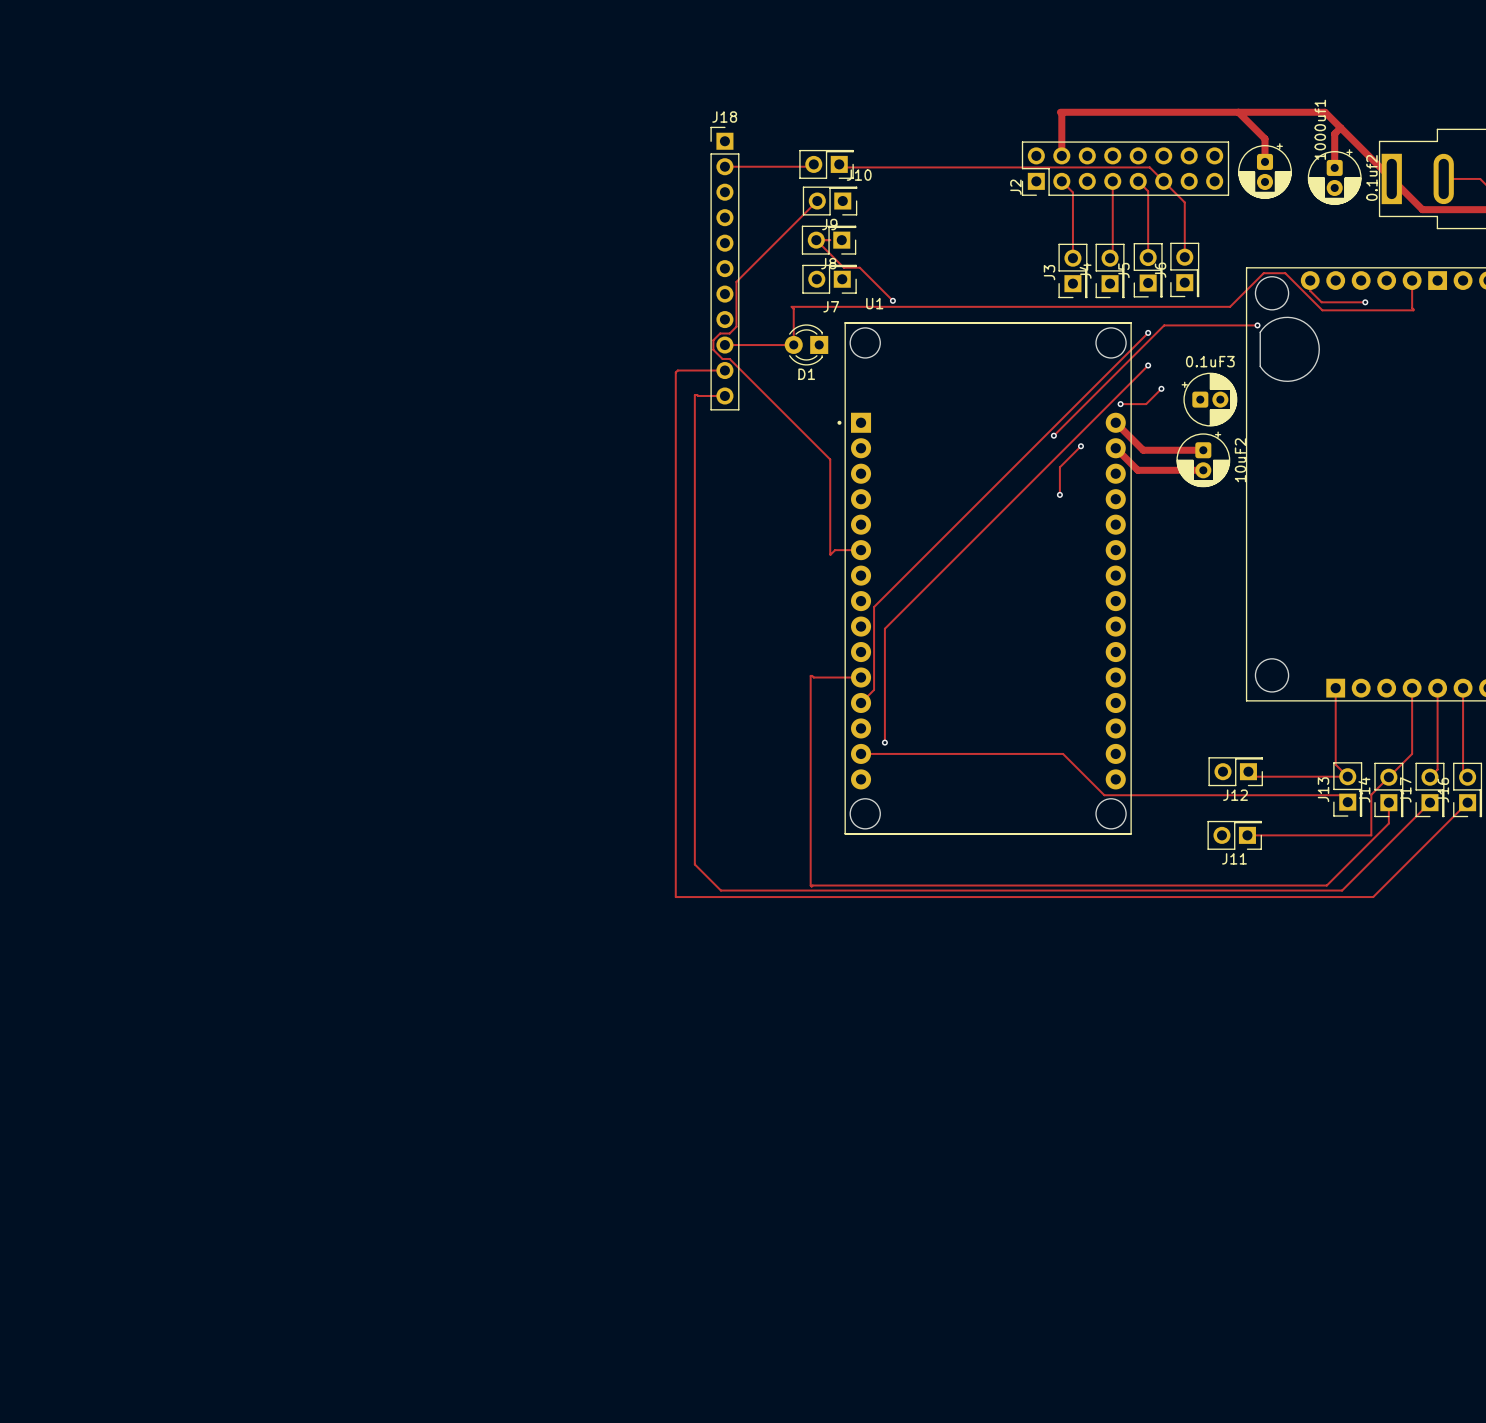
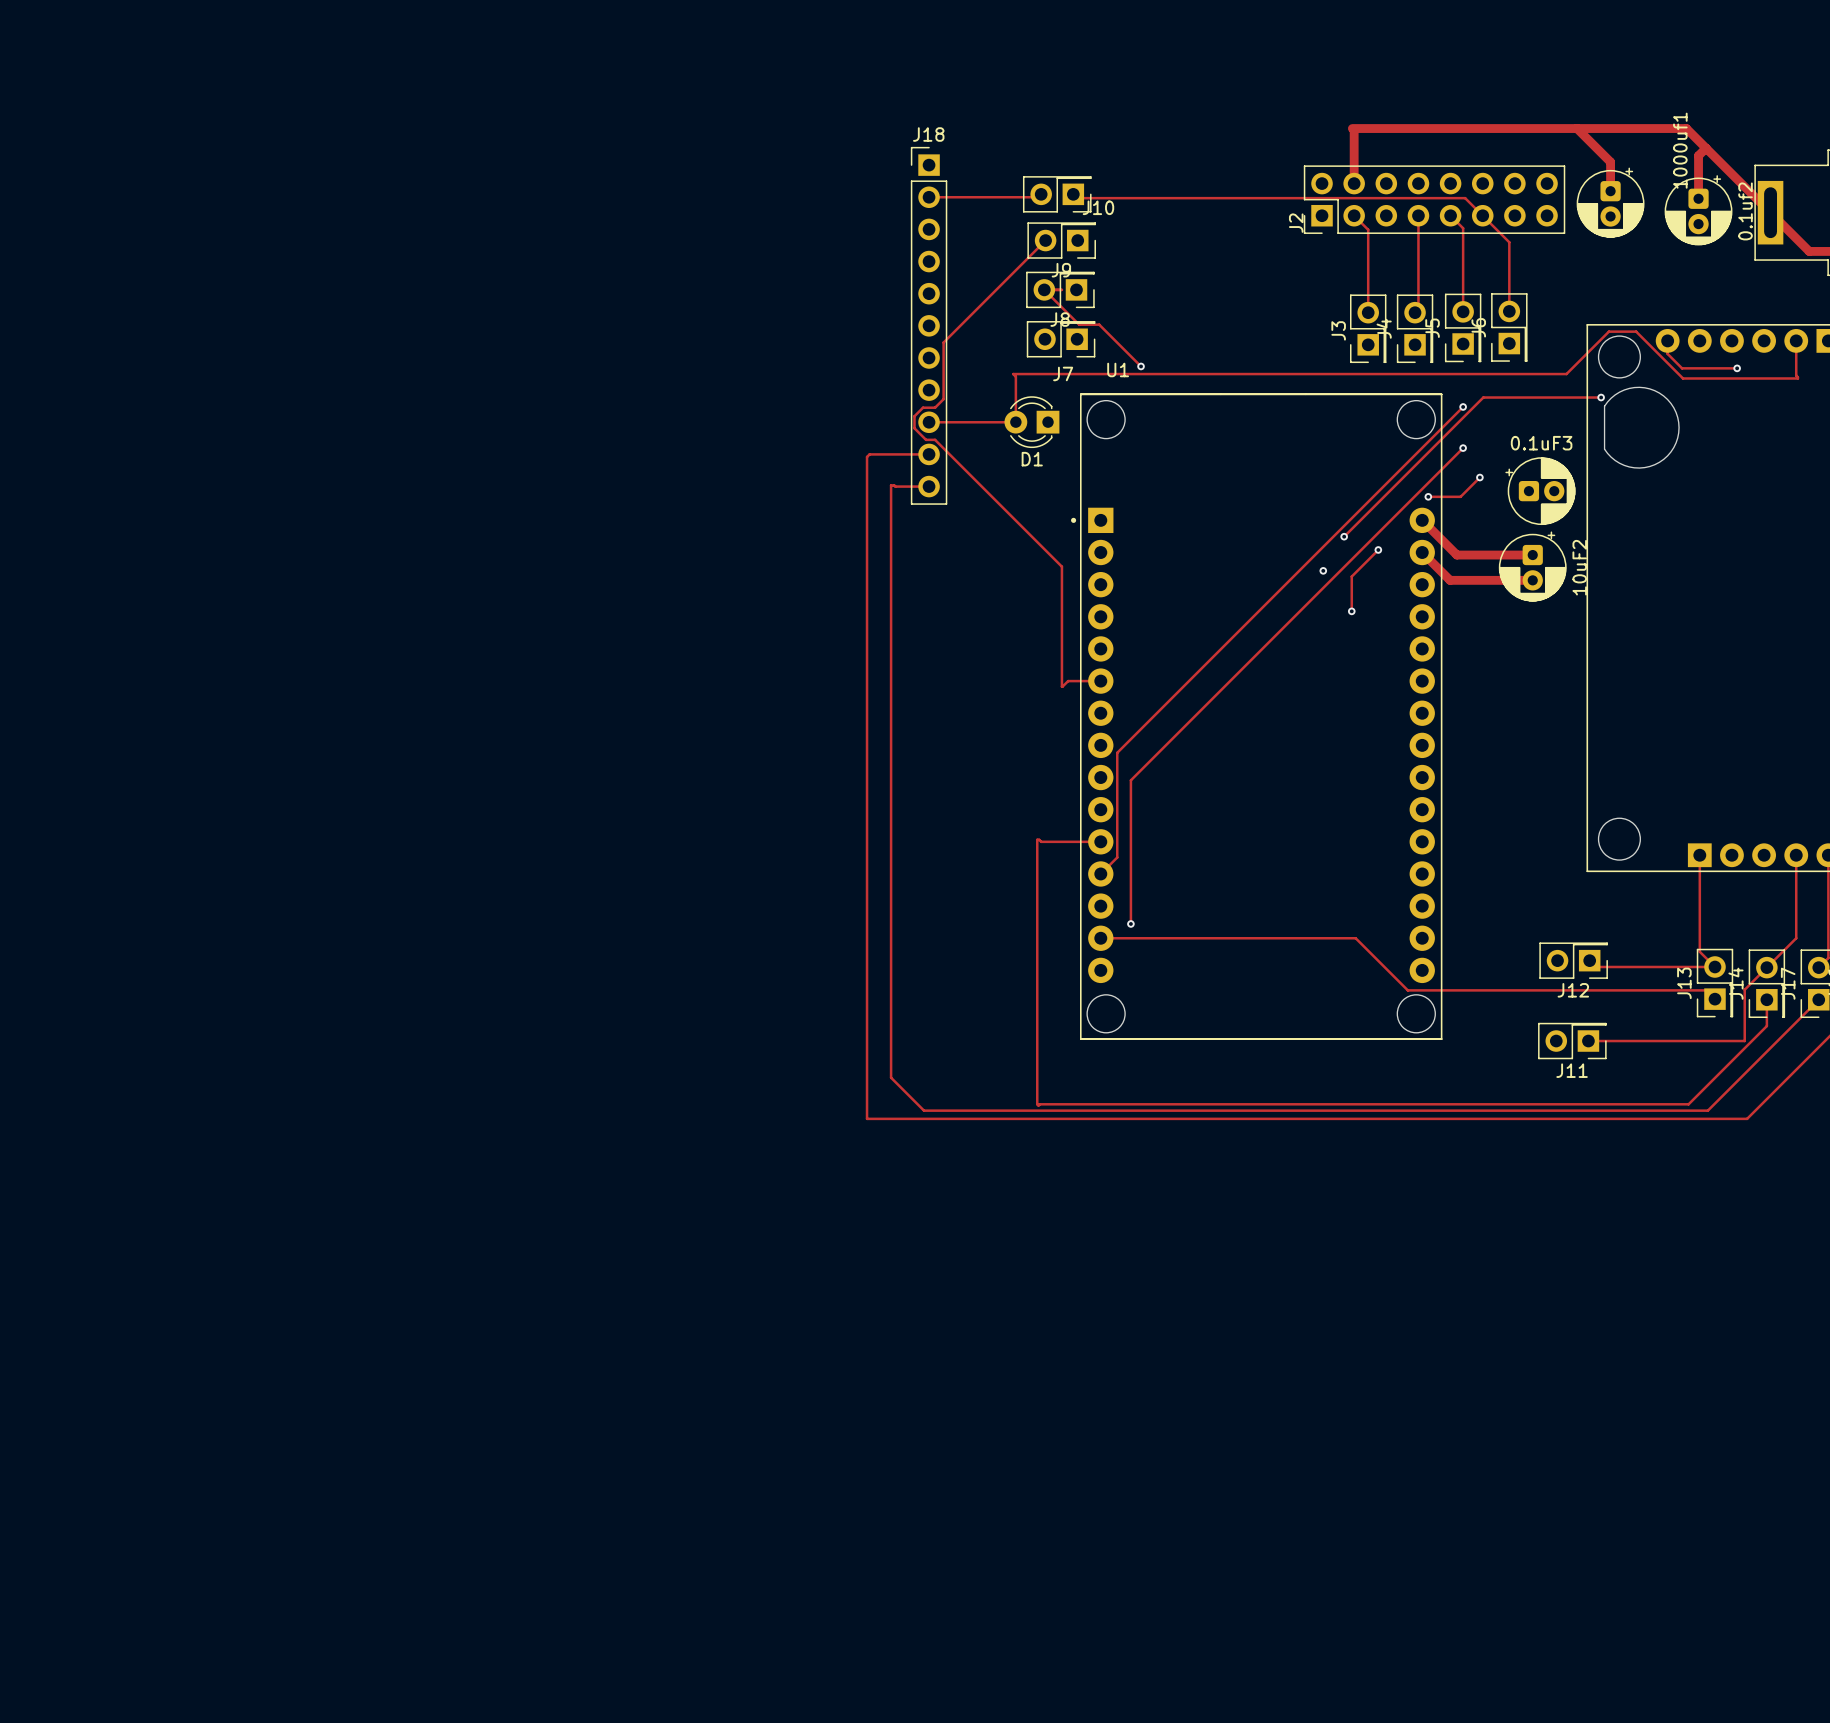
via: none -> (1323, 570)

